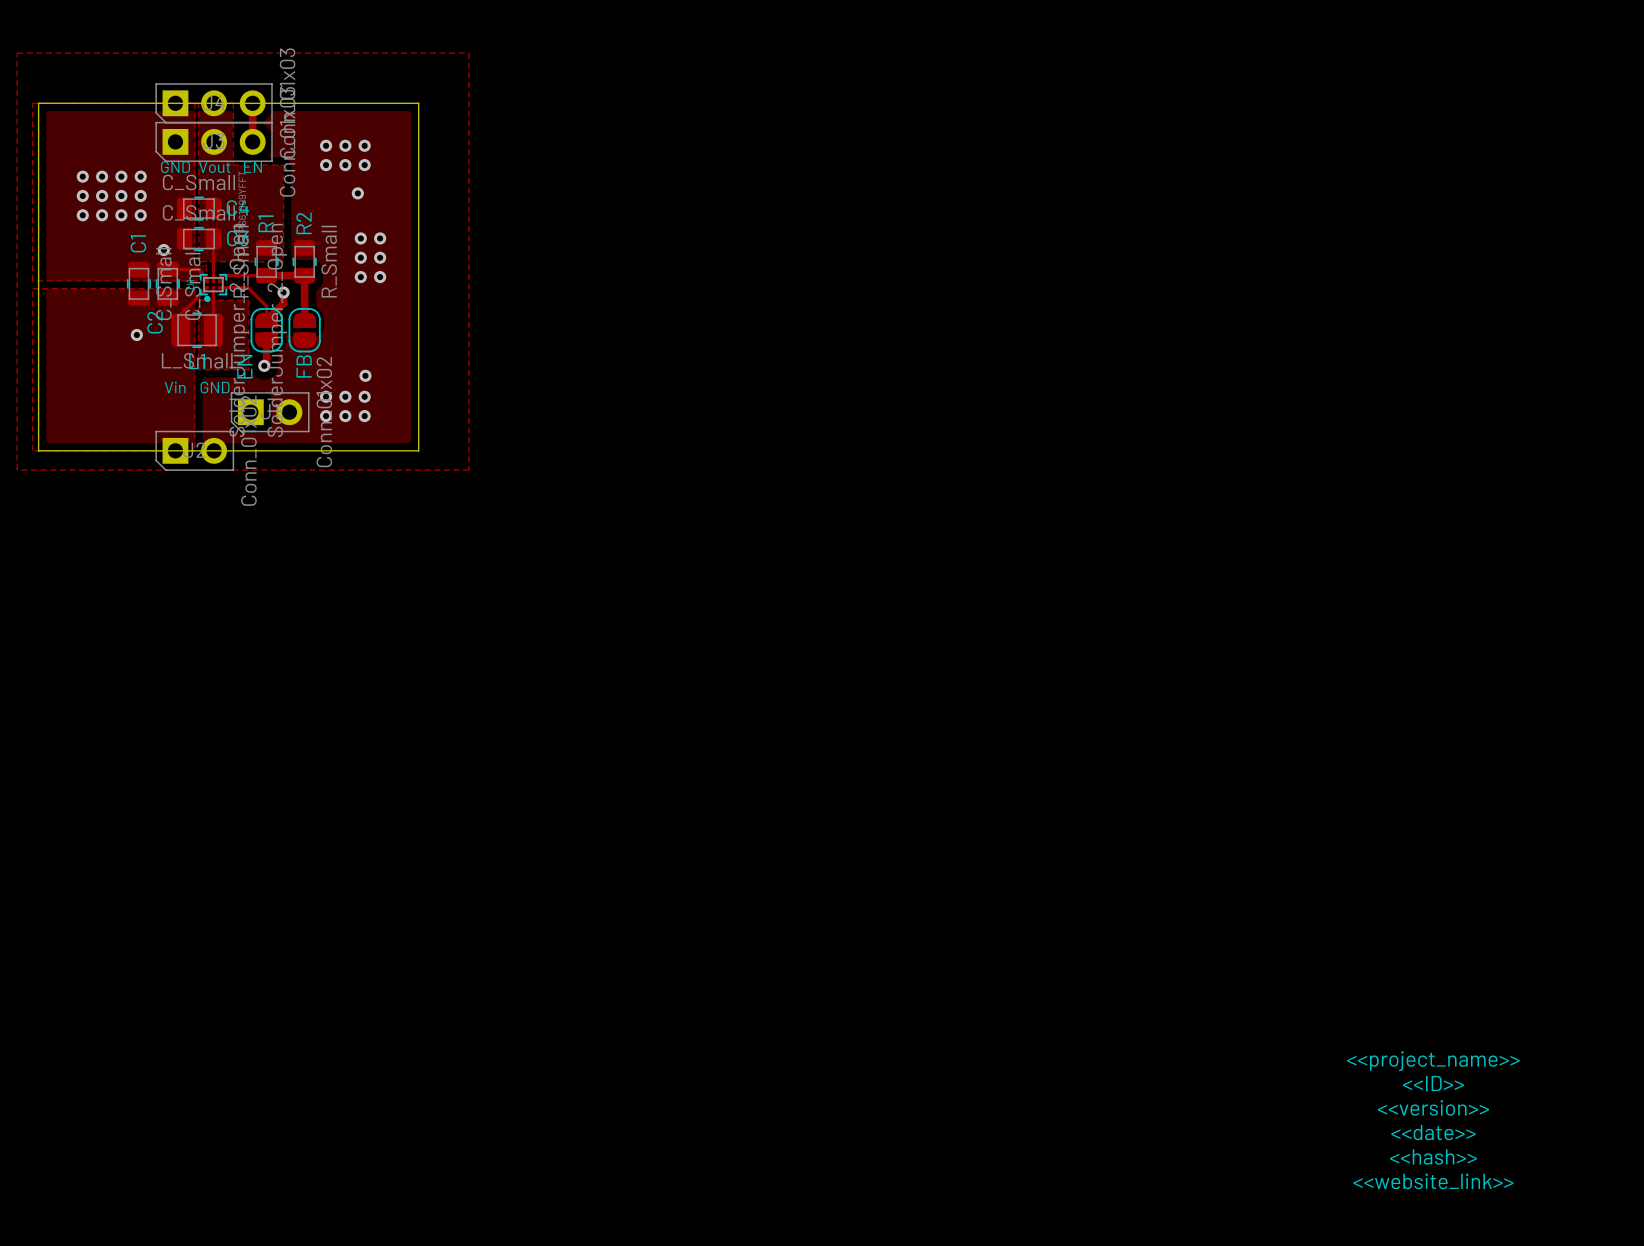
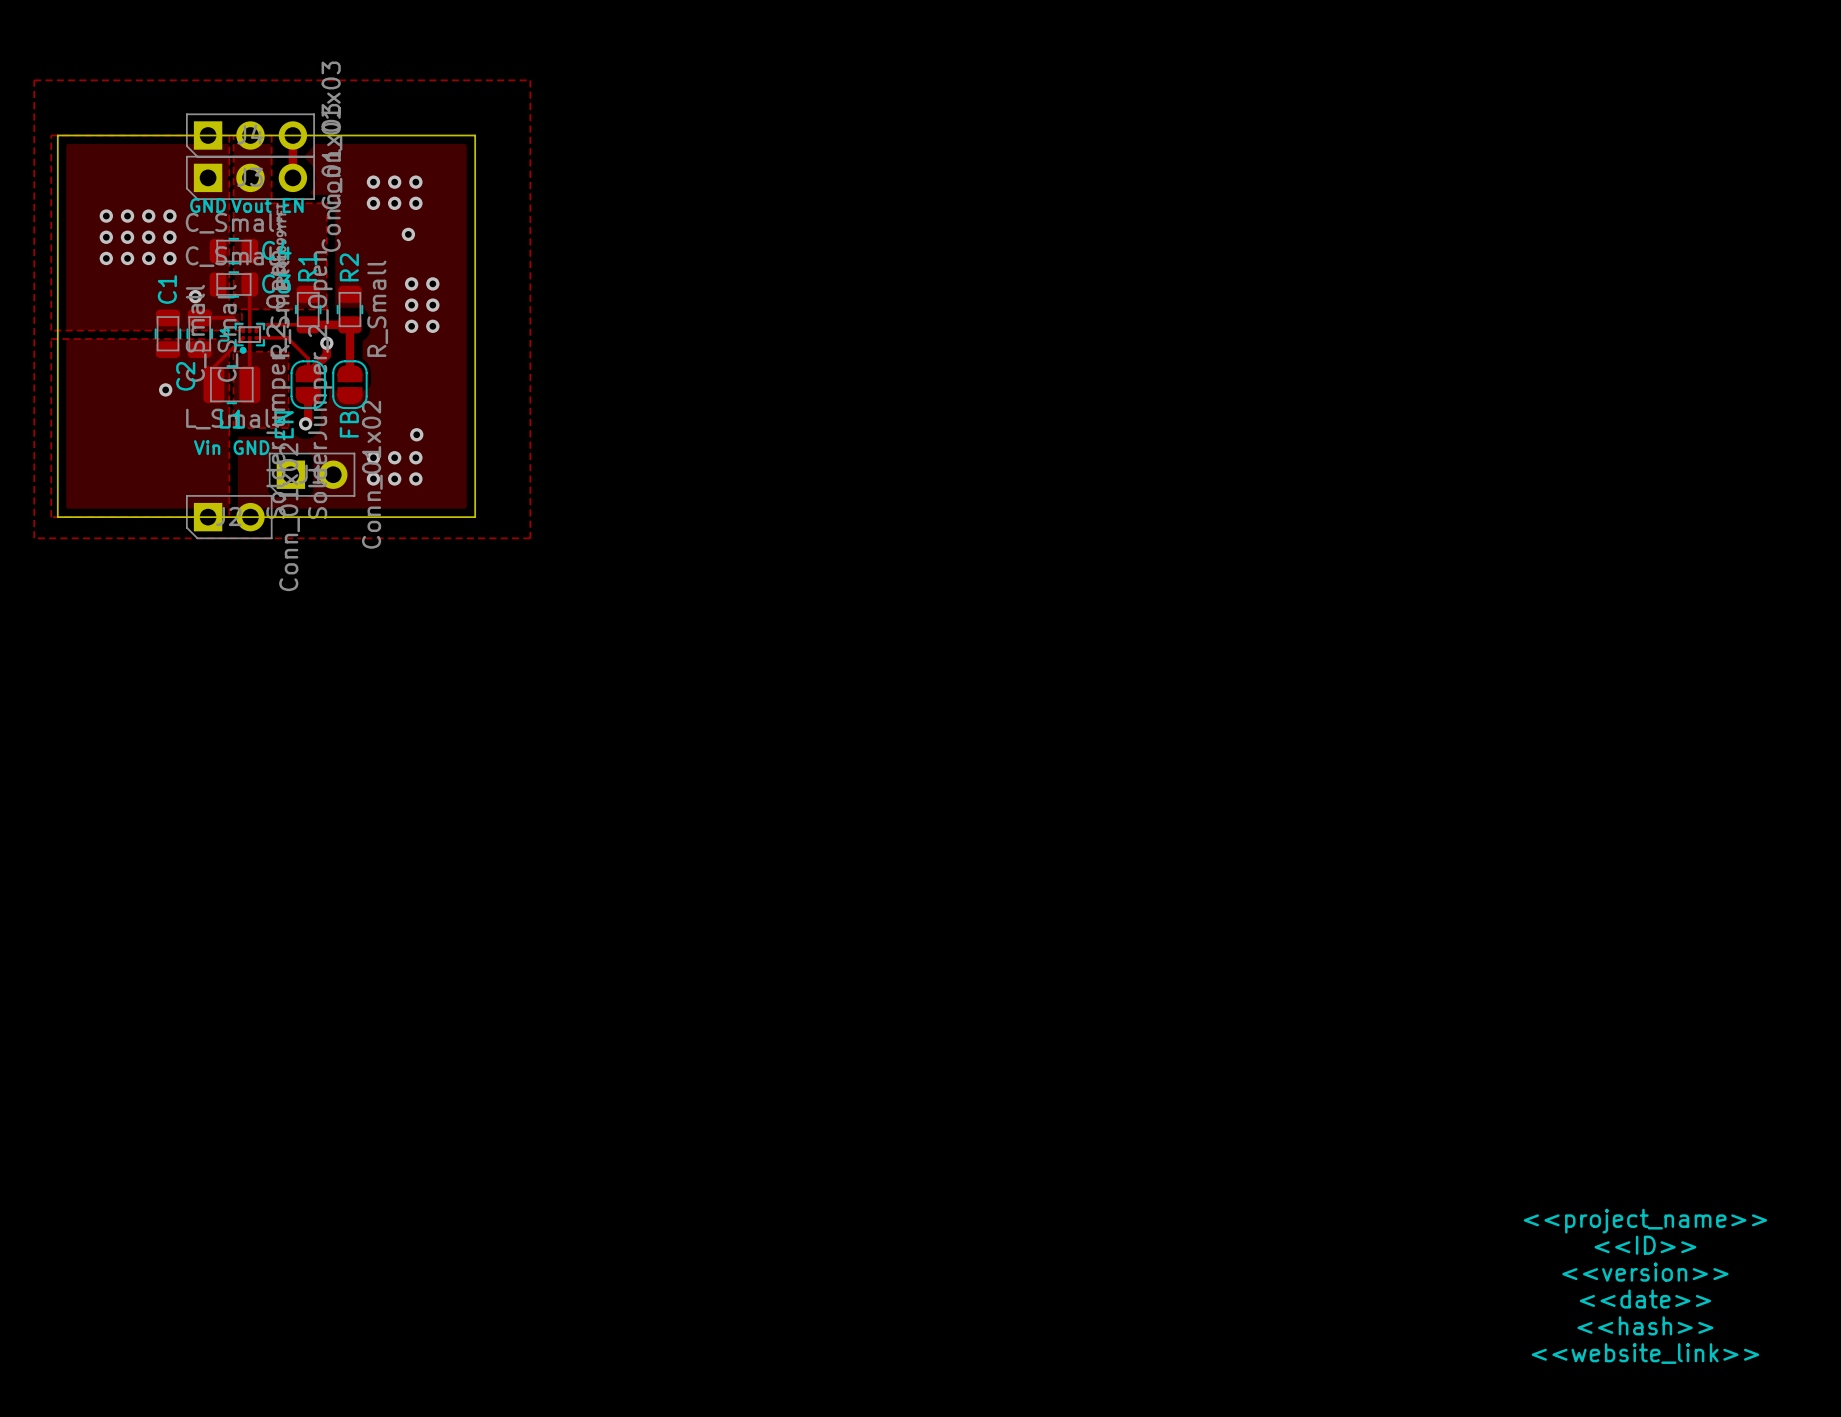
text position: <<project_name>> (1433, 1061) -> <<project_name>> (1645, 1221)
text position: <<ID>> (1433, 1083) -> <<ID>> (1645, 1245)
text position: <<version>> (1433, 1107) -> <<version>> (1645, 1272)
text position: <<date>> (1433, 1132) -> <<date>> (1645, 1298)
text position: <<hash>> (1433, 1156) -> <<hash>> (1645, 1325)
text position: <<website_link>> (1433, 1181) -> <<website_link>> (1645, 1353)

